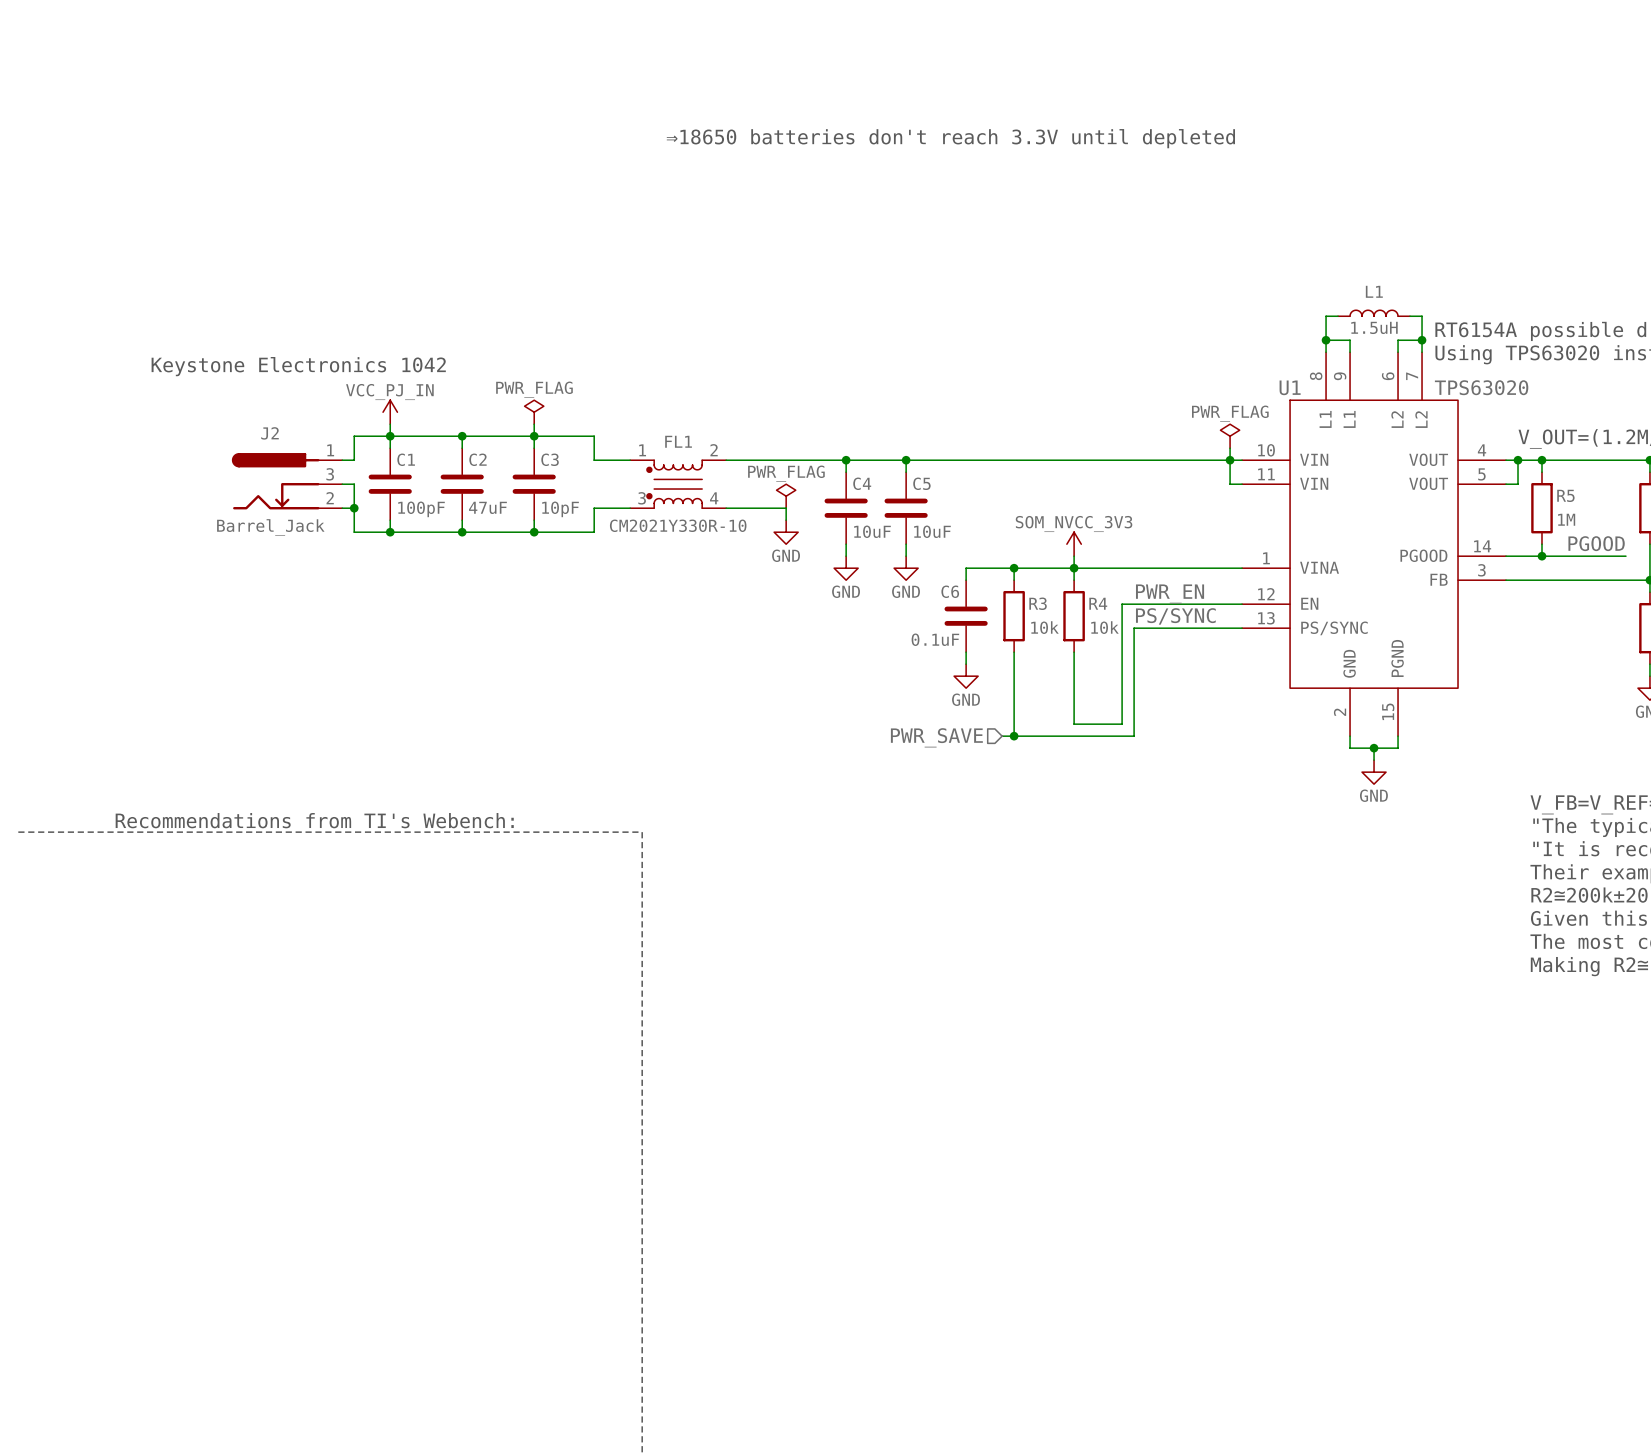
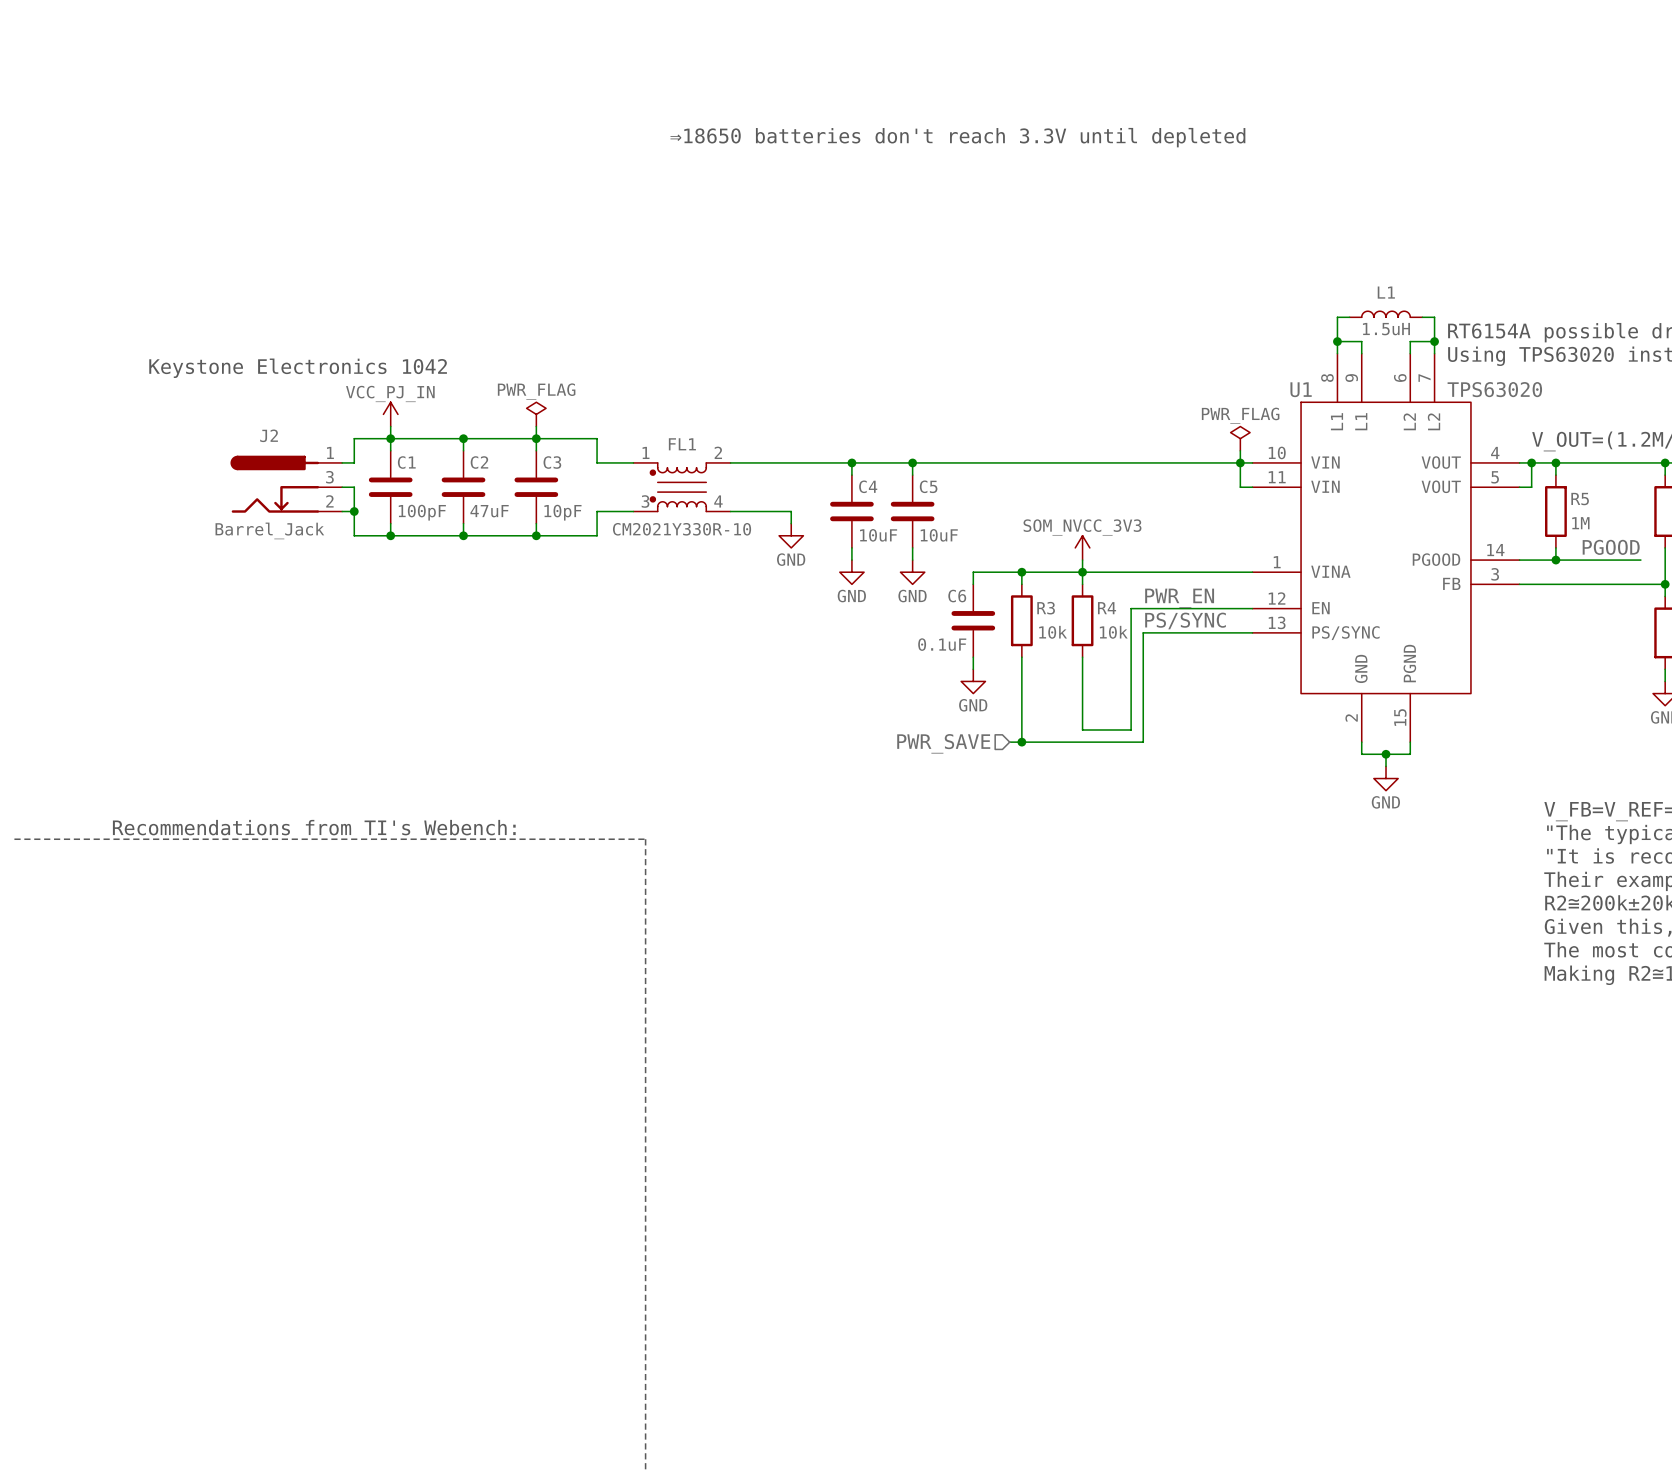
power symbol: PWR_FLAG (786, 496) -> none

